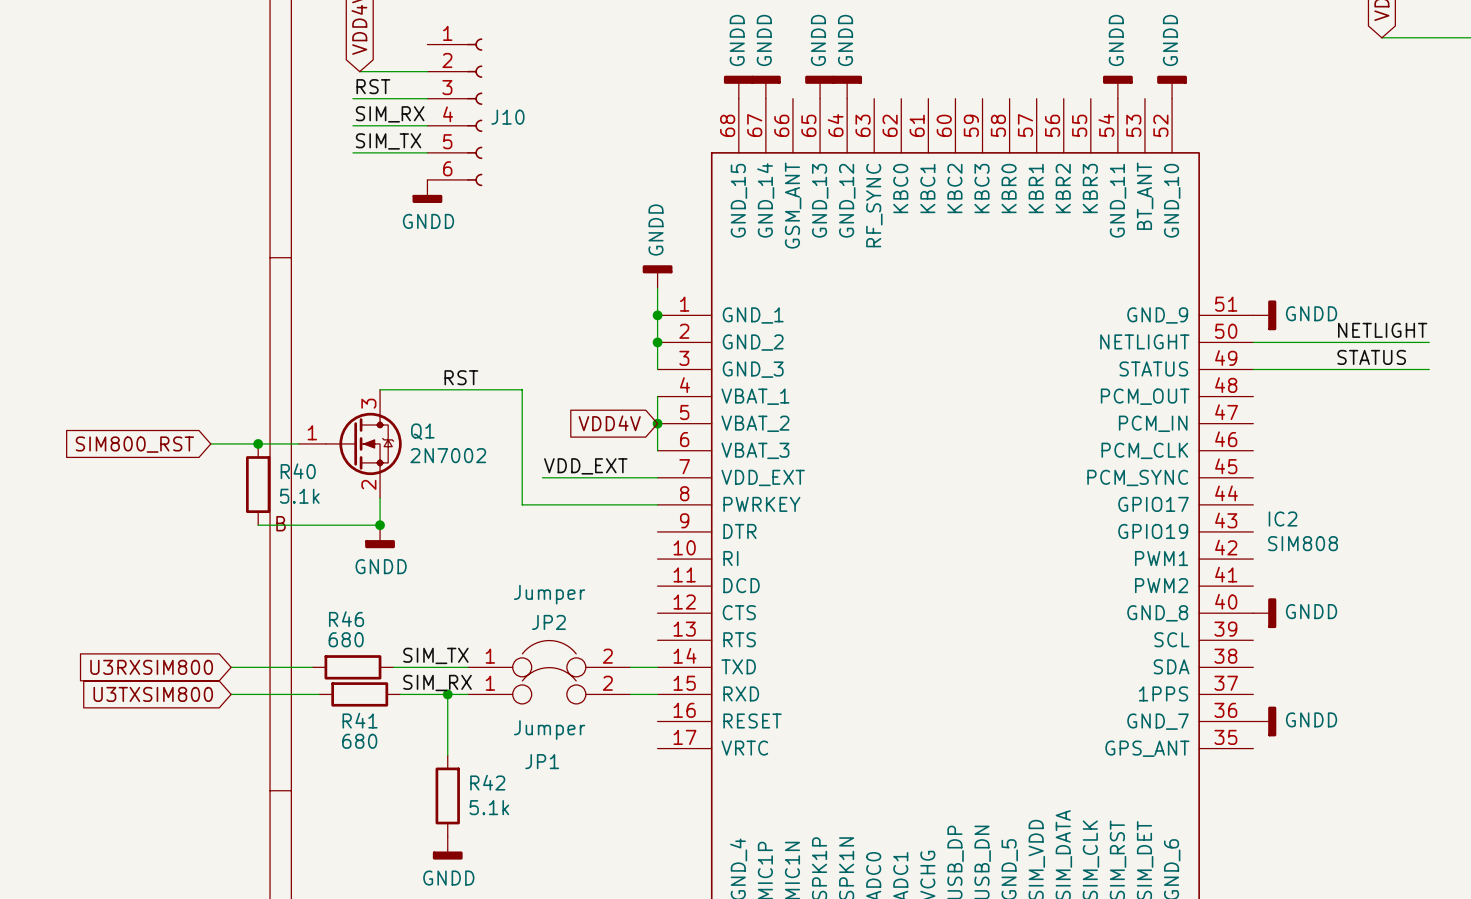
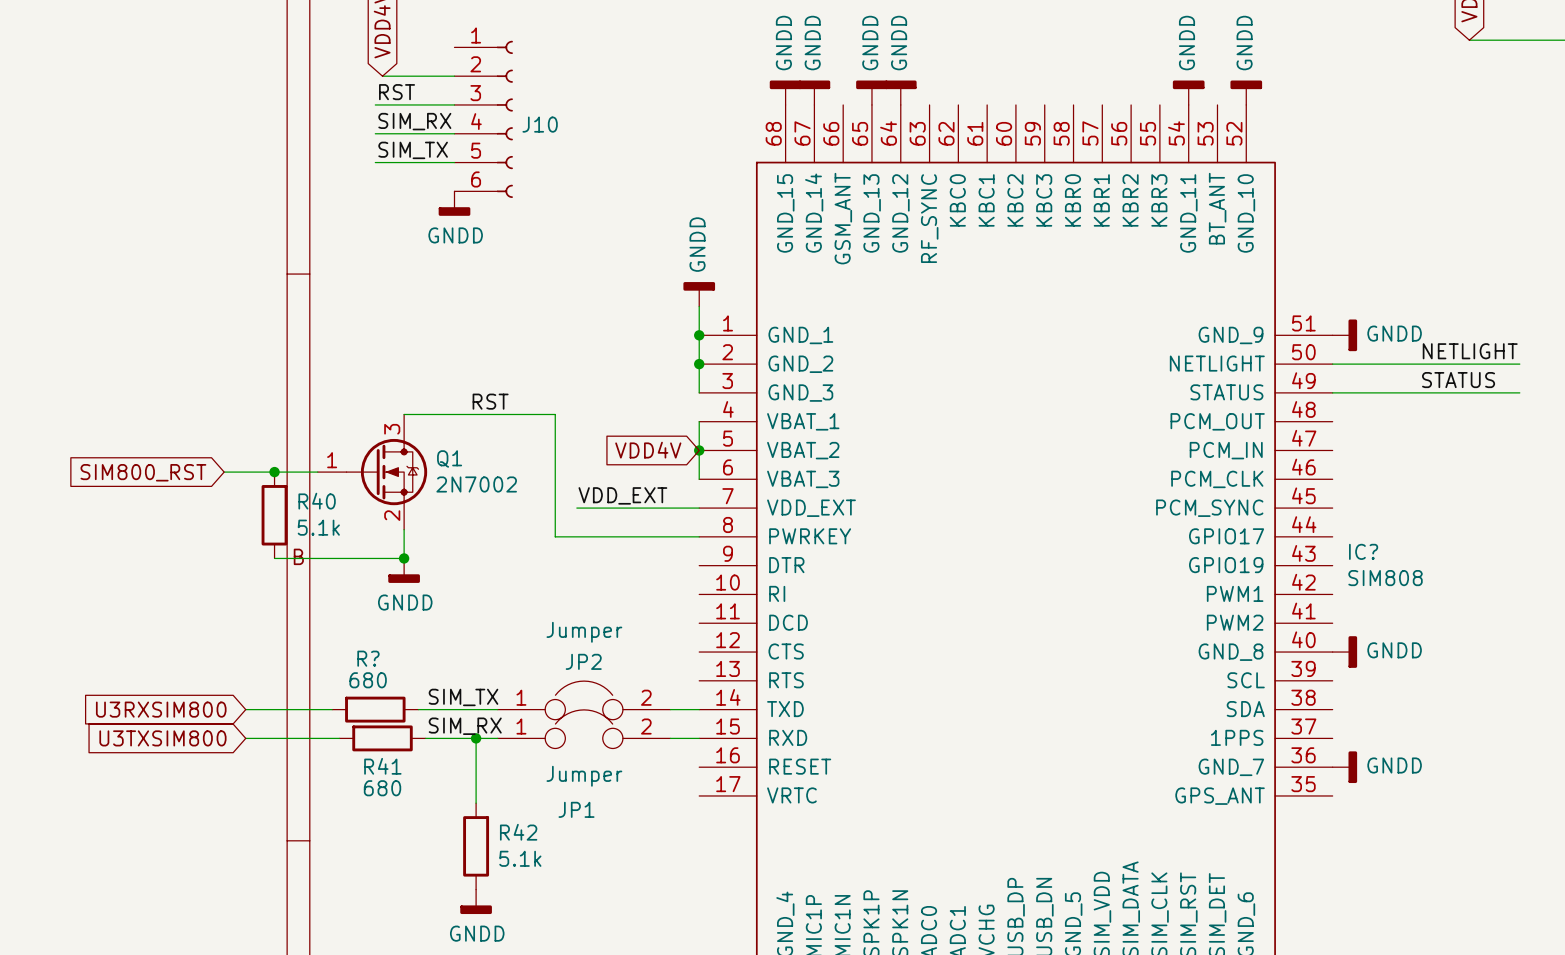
IC2 name: IC2 (1283, 519) -> IC? (1363, 551)
R46 name: R46 (346, 619) -> R? (368, 658)

